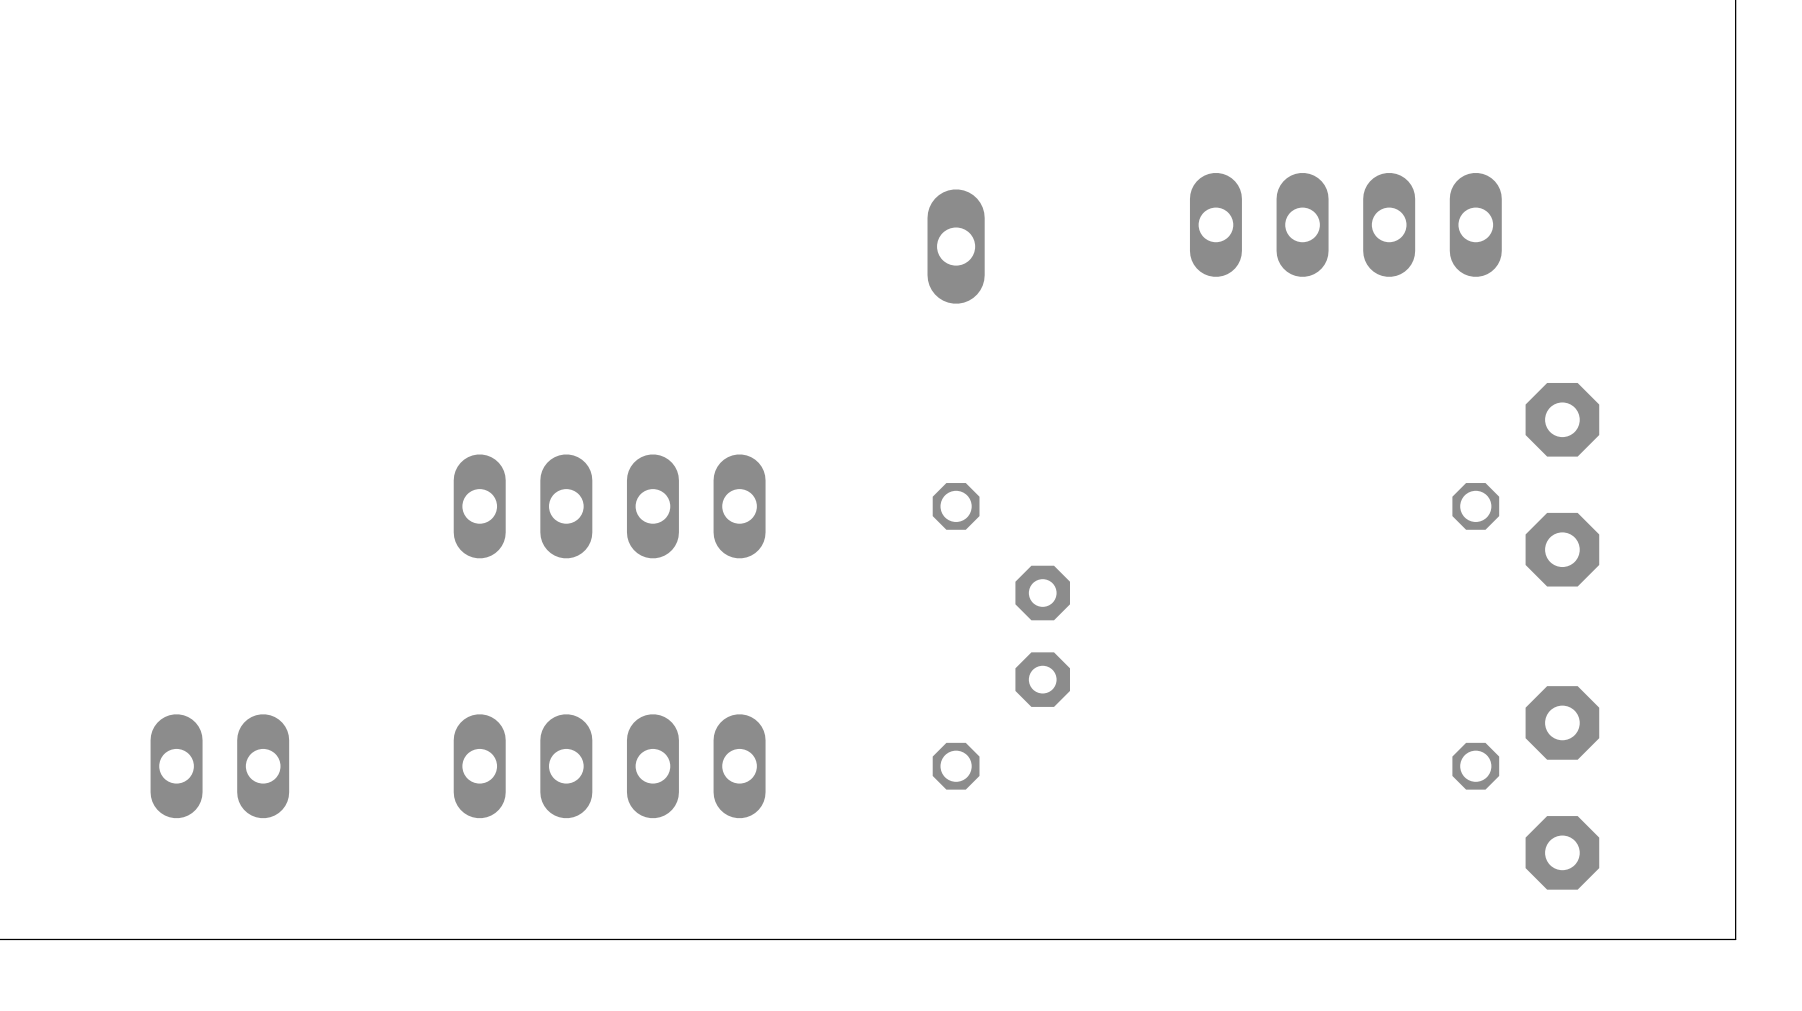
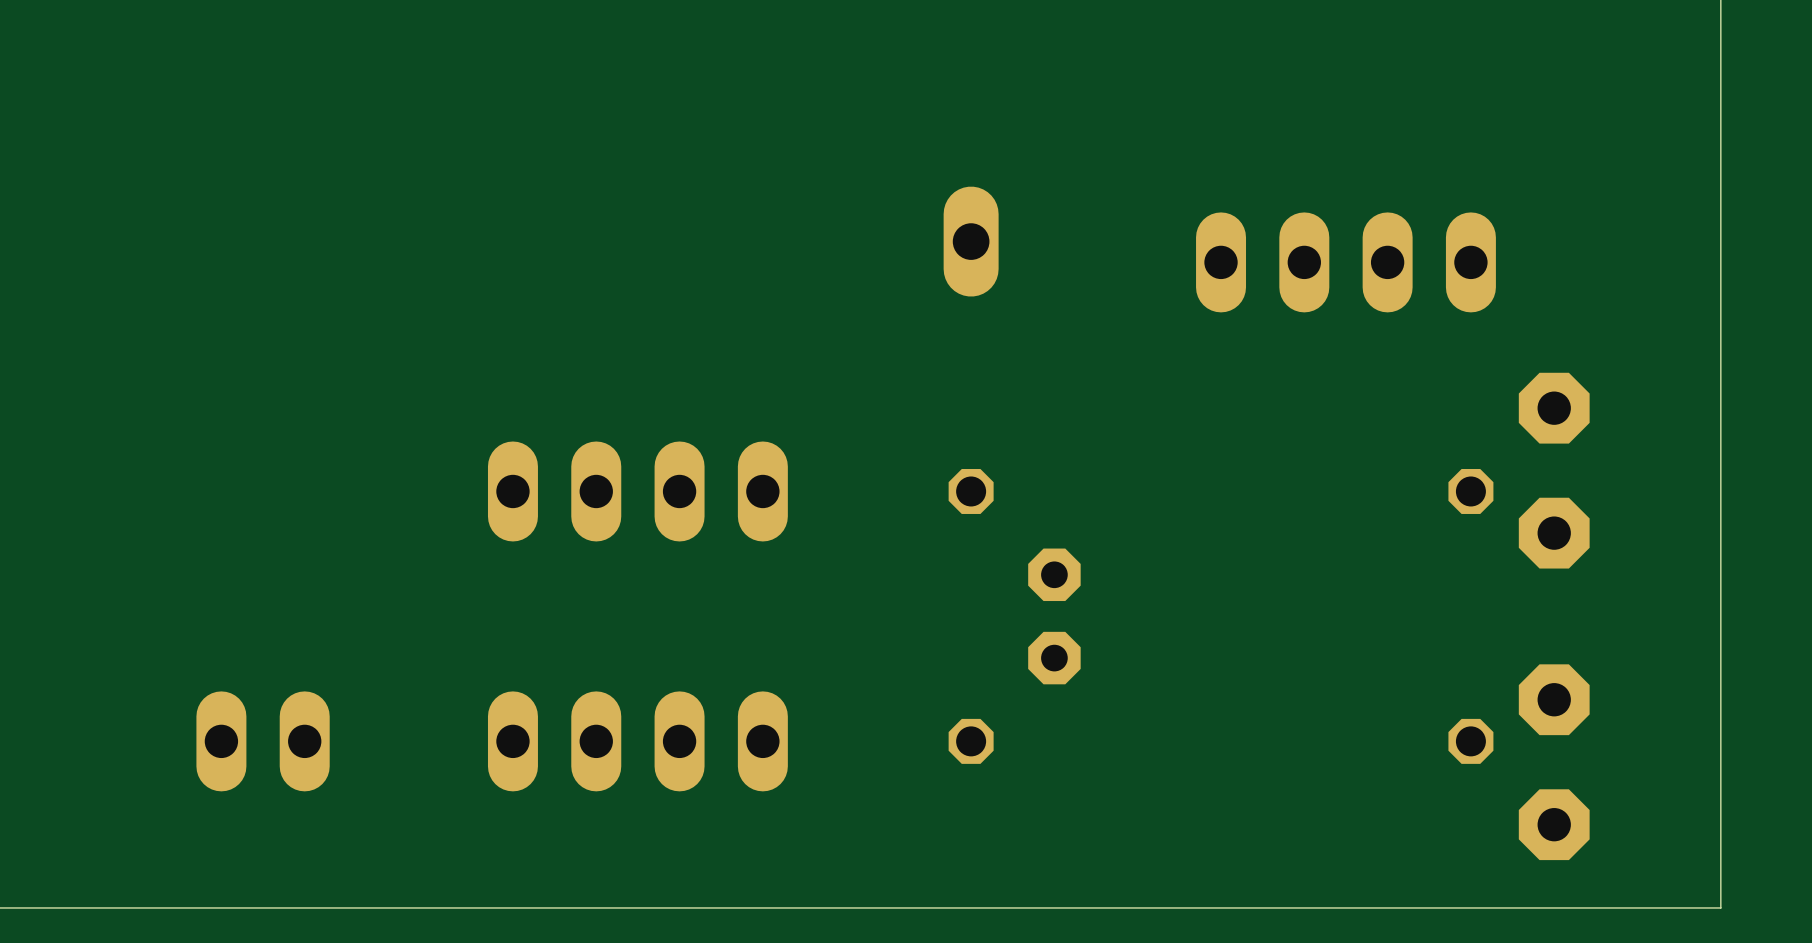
part position: (1345, 224) -> (1345, 262)

